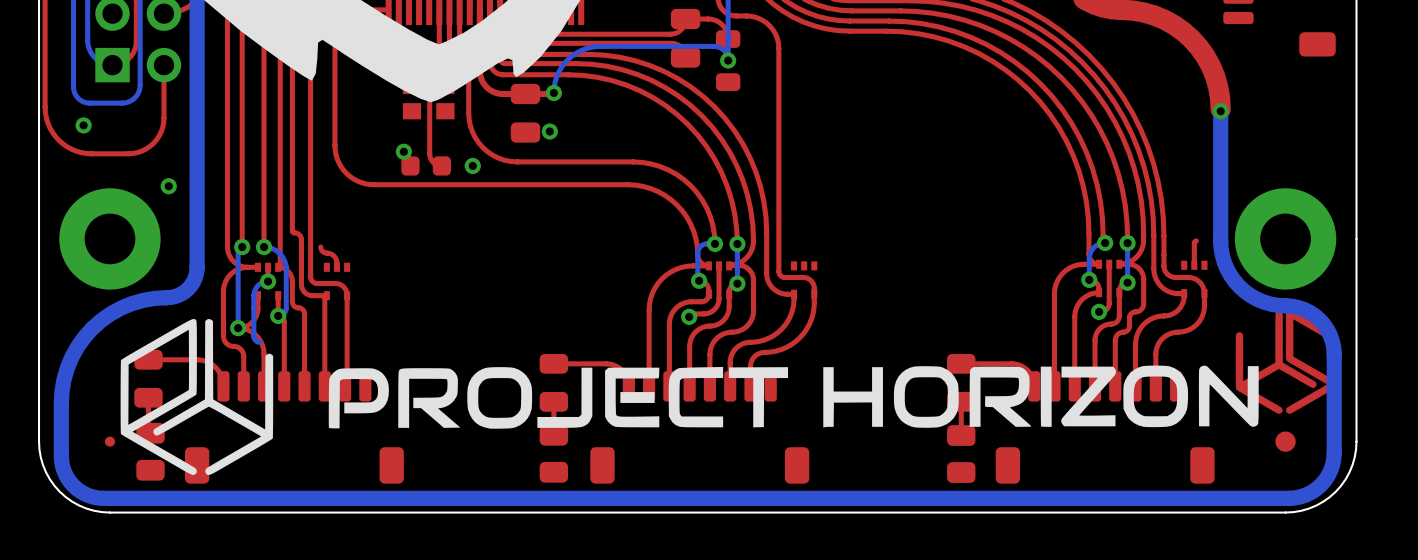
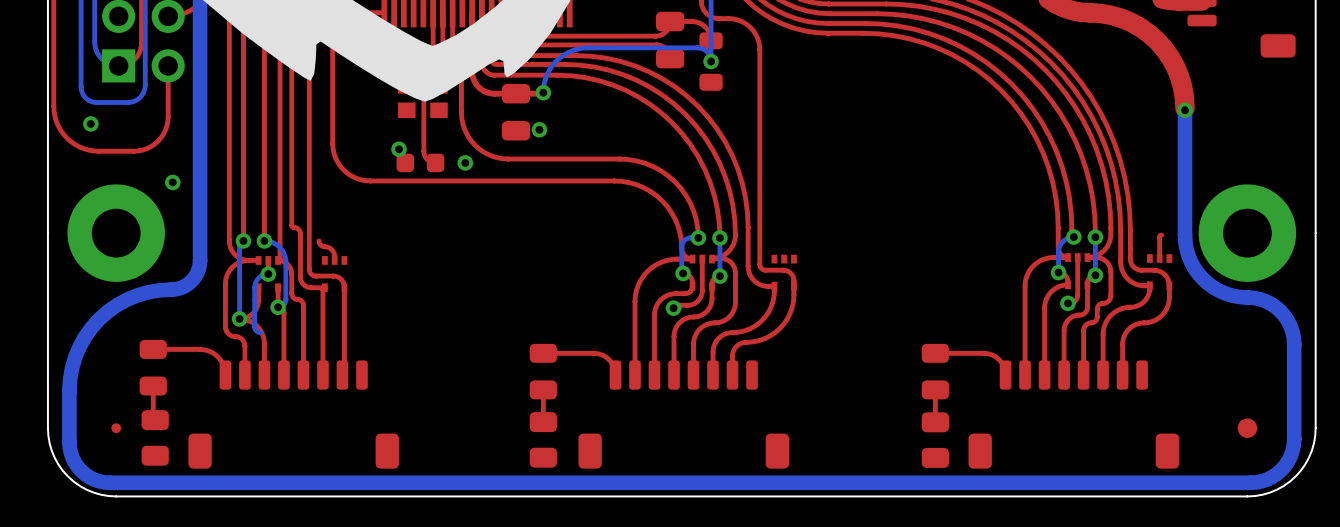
drawing: [120, 309, 1339, 476] -> none

